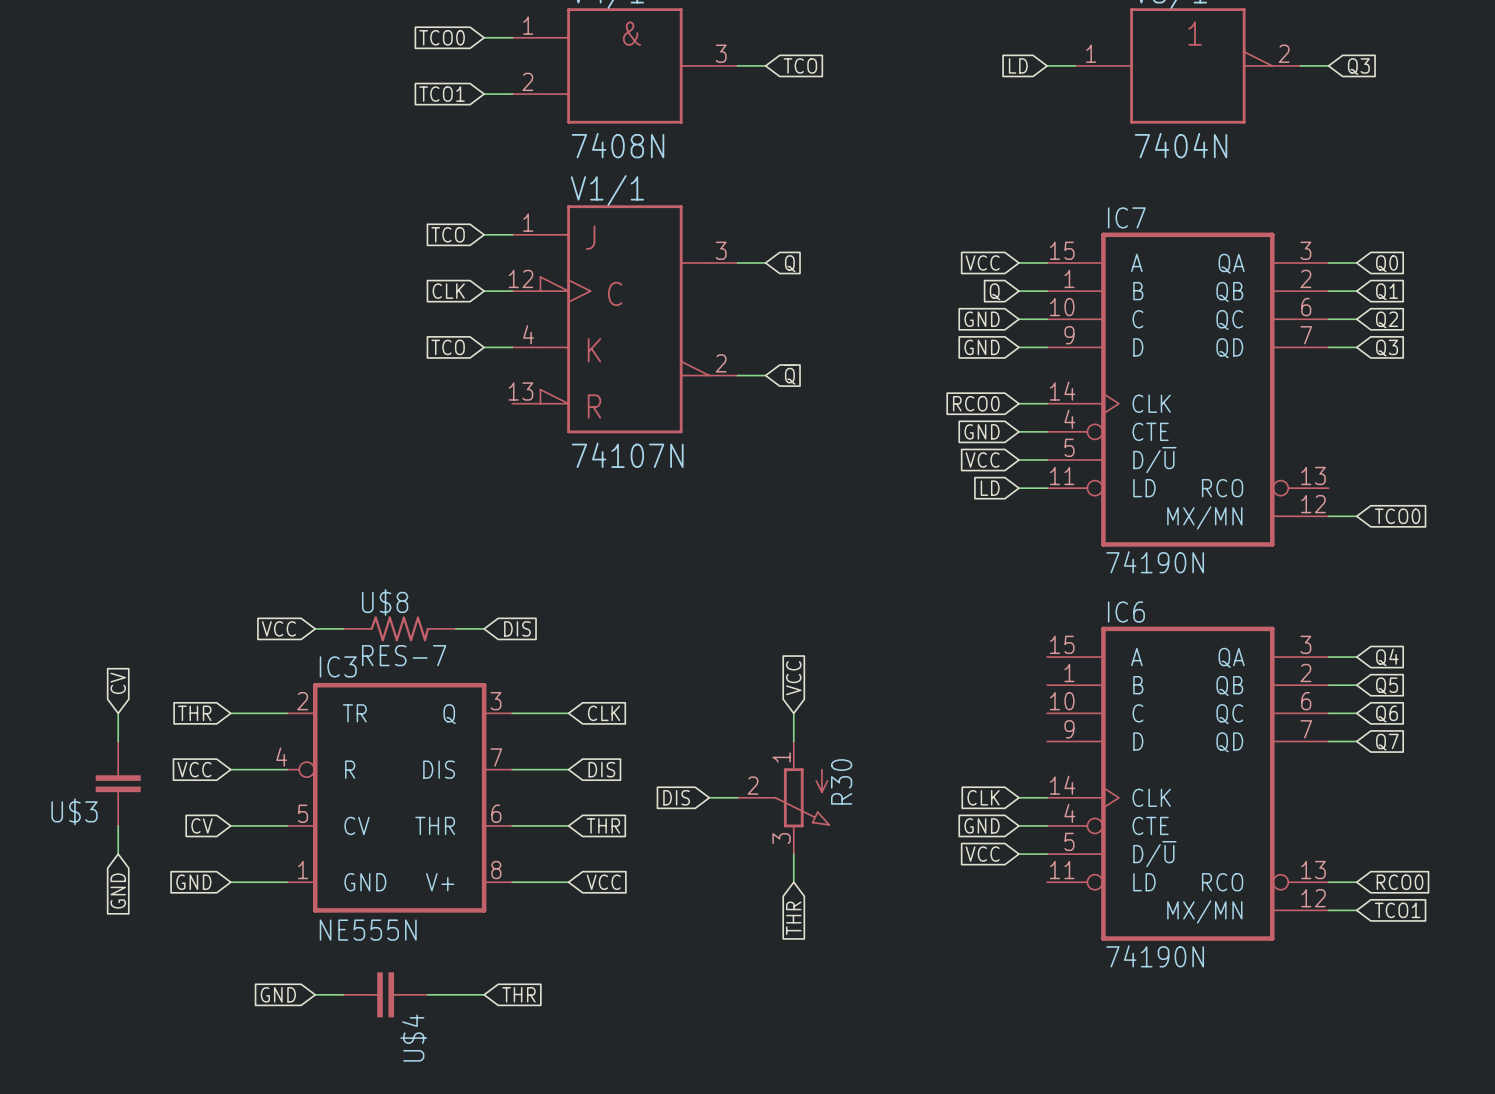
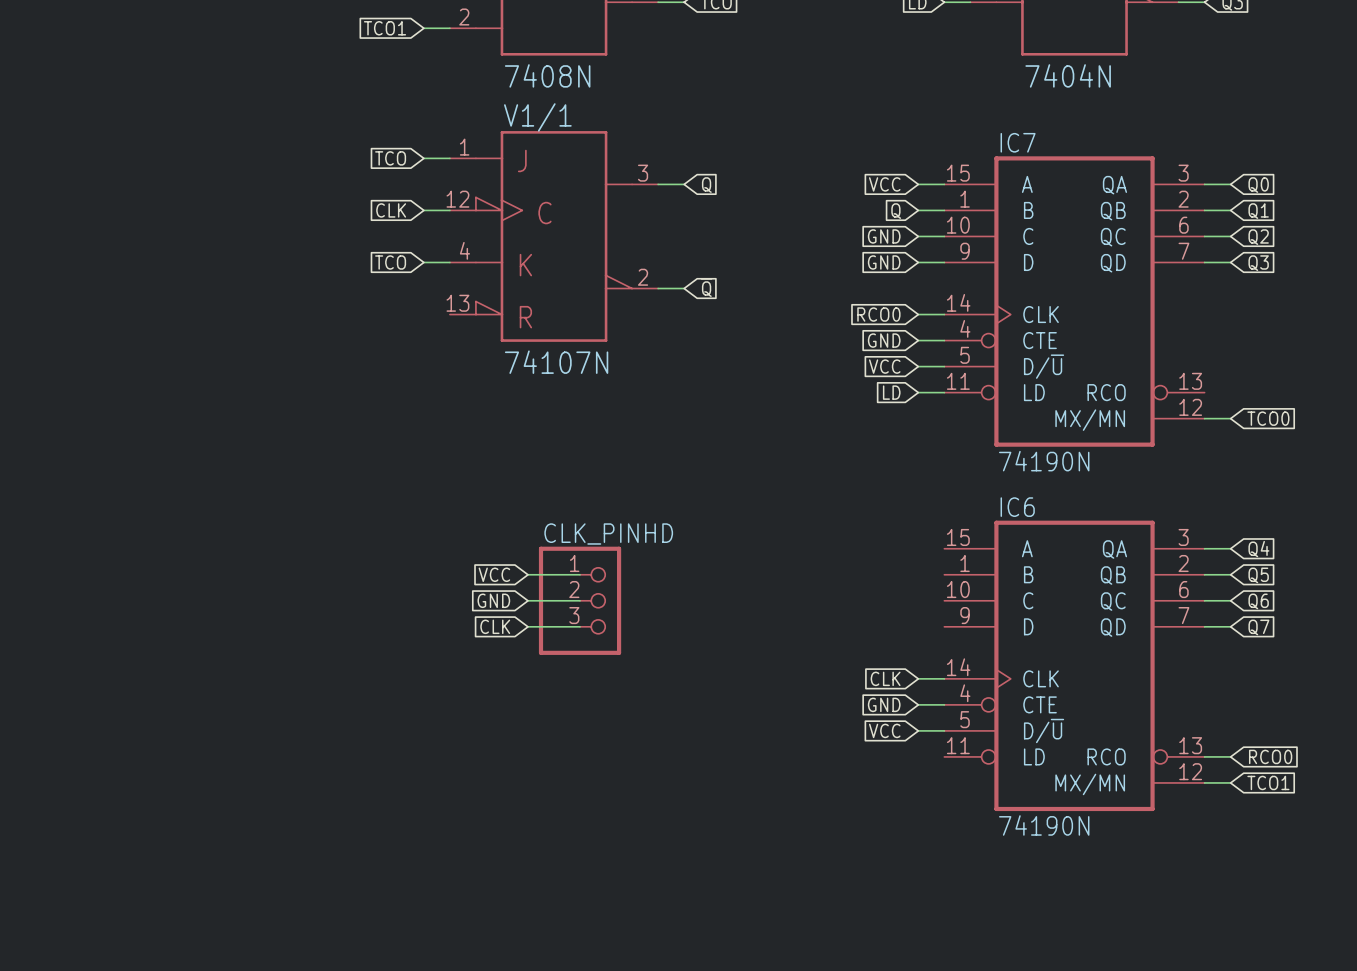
global label: VCC (278, 628) -> none
wire: (315, 628) (343, 628) -> none
U$8: RES-7 (399, 628) -> none
wire: (455, 628) (484, 628) -> none
global label: DIS (517, 628) -> none
global label: VCC (793, 678) -> none
global label: CV (118, 683) -> none
global label: none -> VCC (494, 574)
wire: (118, 713) (118, 741) -> none
global label: THR (194, 713) -> none
wire: (230, 713) (287, 713) -> none
wire: (512, 713) (568, 713) -> (527, 574) (580, 574)
global label: none -> GND (493, 600)
global label rotation: 0° (604, 713) -> 180° (495, 626)
CLK_PINHD: none -> (580, 600)
wire: (793, 713) (793, 741) -> none
global label: VCC (194, 769) -> none
wire: (230, 769) (287, 769) -> none
wire: (512, 769) (568, 769) -> (527, 626) (580, 626)
global label: DIS (601, 769) -> none
U$3: (118, 783) -> none
IC3: NE555N (399, 797) -> none
global label: DIS (676, 797) -> none
wire: (709, 797) (737, 797) -> none
R30: (783, 797) -> none
wire: (118, 825) (118, 854) -> none
global label: CV (202, 825) -> none
wire: (230, 825) (287, 825) -> none
wire: (512, 825) (568, 825) -> (527, 600) (580, 600)
global label: THR (603, 825) -> none
wire: (793, 854) (793, 882) -> none
global label: GND (193, 882) -> none
wire: (230, 882) (287, 882) -> none
wire: (512, 882) (568, 882) -> none
global label: VCC (603, 882) -> none
global label: GND (118, 891) -> none
global label: THR (793, 918) -> none
global label: GND (278, 994) -> none
wire: (315, 994) (343, 994) -> none
U$4: (385, 994) -> none
wire: (427, 994) (484, 994) -> none
global label: THR (518, 994) -> none

